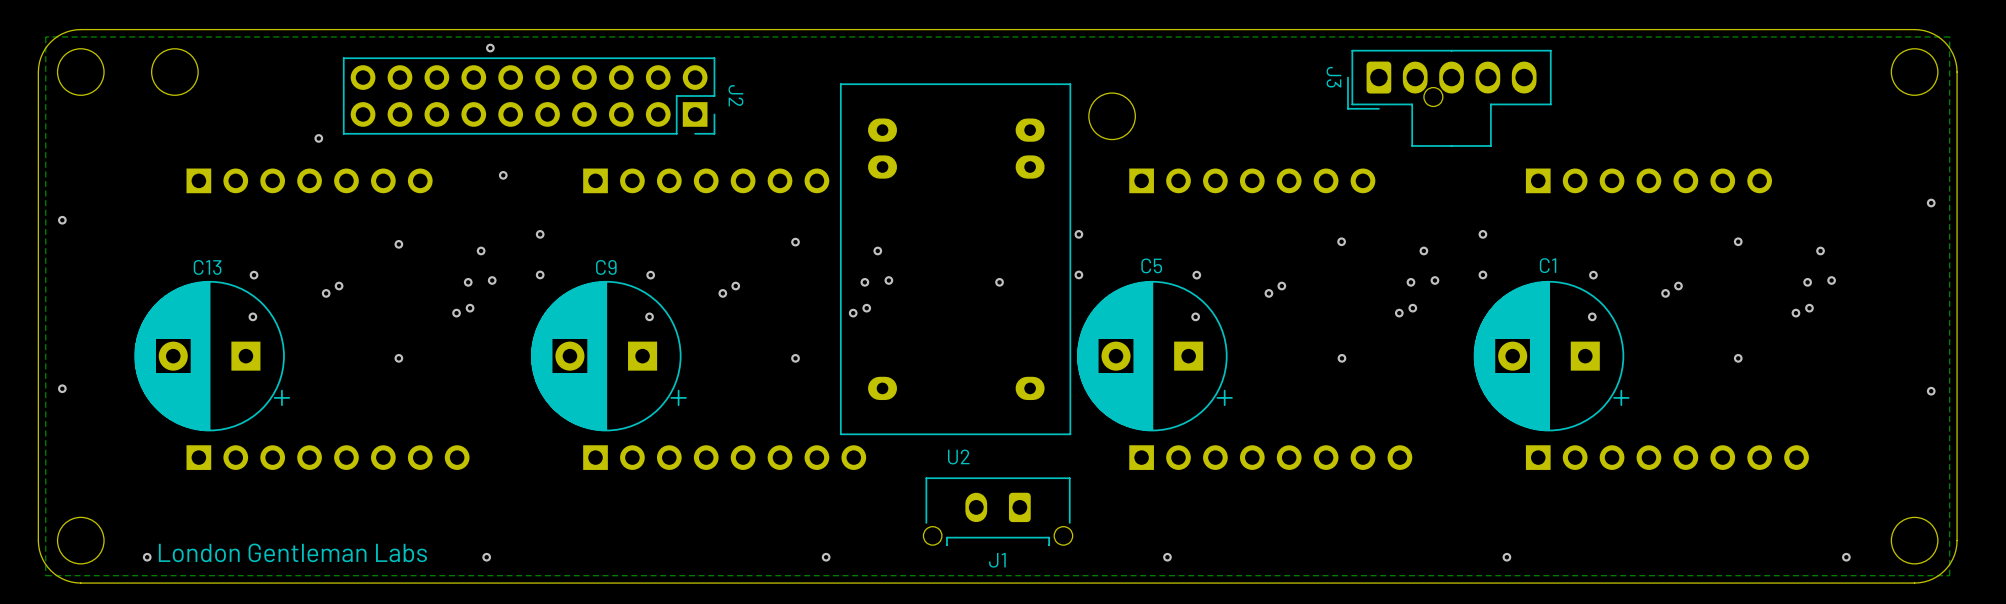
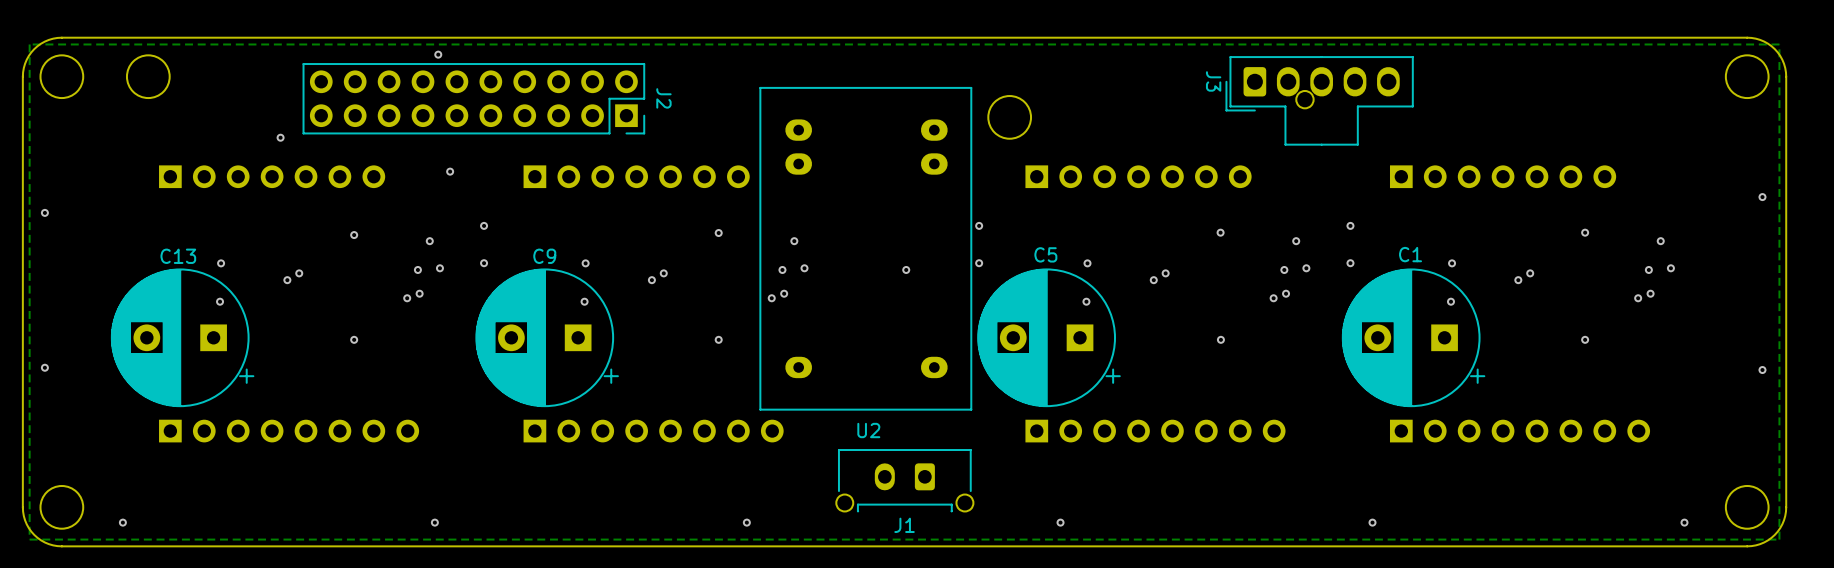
text: London Gentleman Labs (292, 552) -> none

